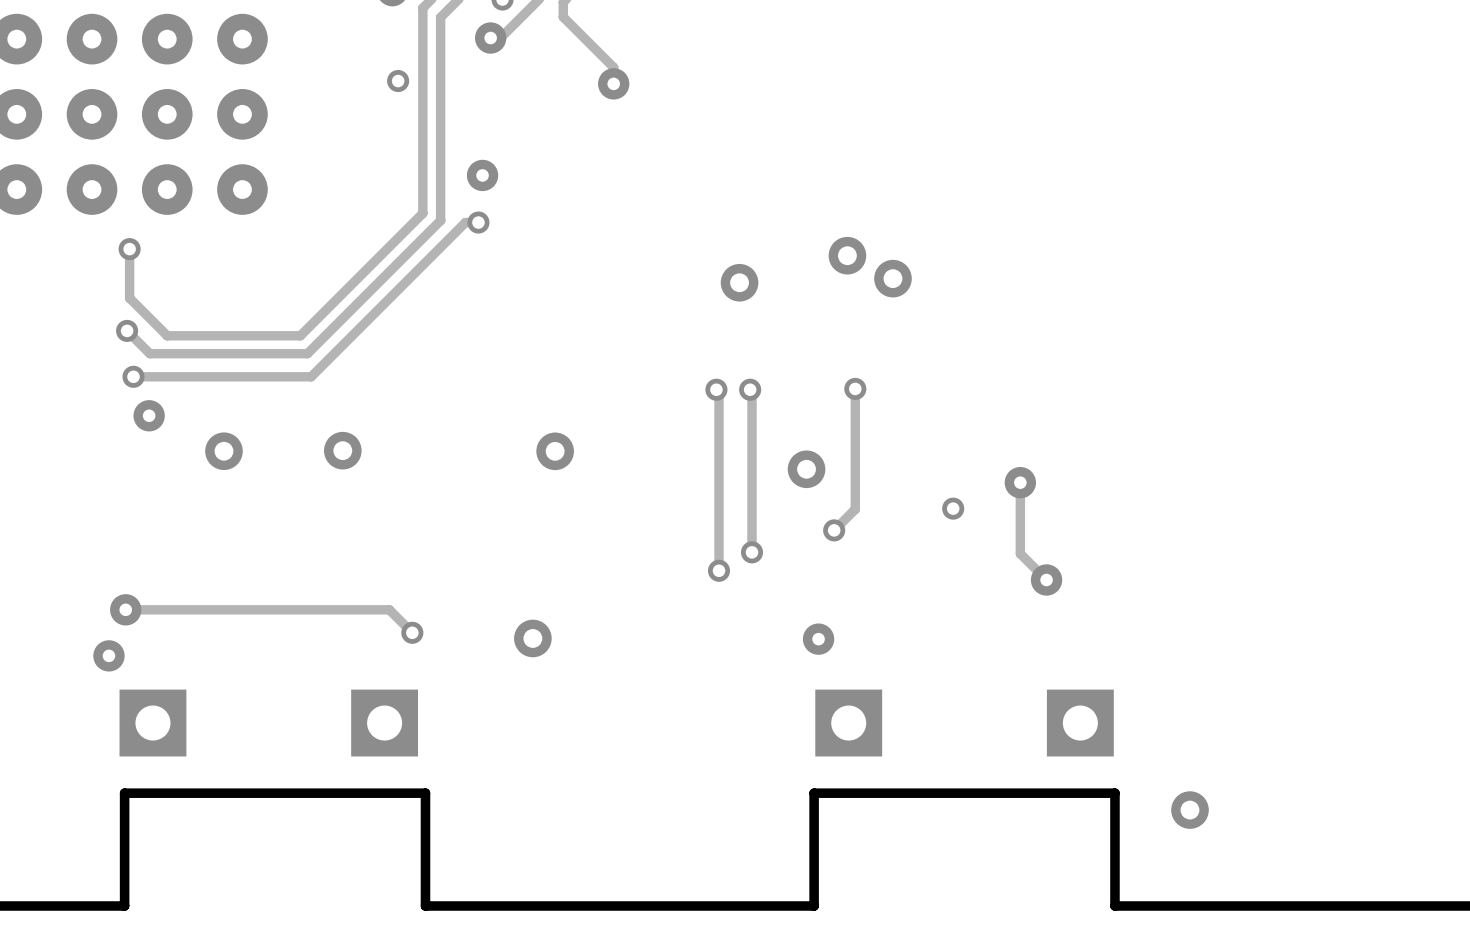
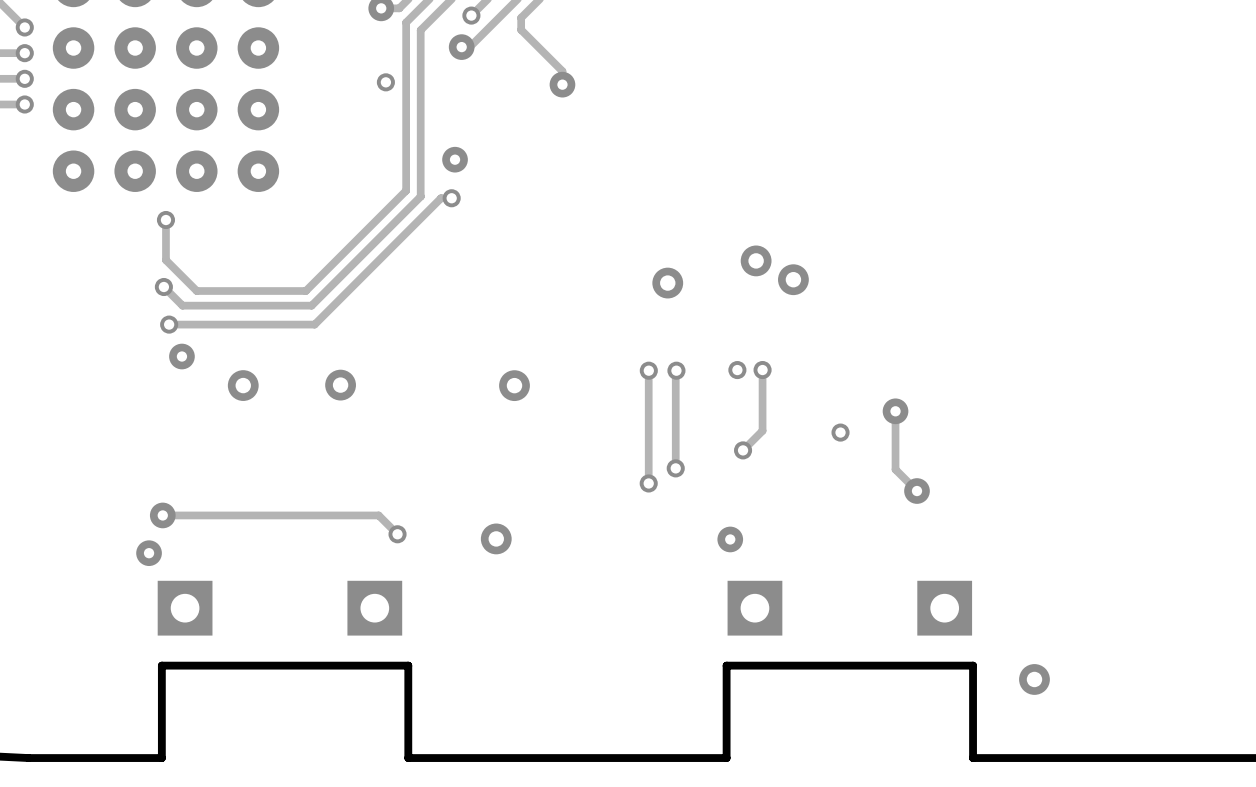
via: (847, 255) -> none
via: (892, 278) -> none
via position: (739, 282) -> (667, 283)
via: none -> (756, 260)
via: none -> (793, 279)
track: (855, 388) (855, 509) -> (762, 370) (762, 430) (760, 433)
via: (855, 388) -> none
track: (716, 389) (719, 392) (719, 433) -> none
via: (716, 389) -> none
track: (750, 389) (752, 391) (752, 433) -> none
via: (750, 389) -> none
via: none -> (737, 370)
via: none -> (762, 370)
via: none -> (648, 370)
via: none -> (676, 370)
via: (806, 469) -> none

